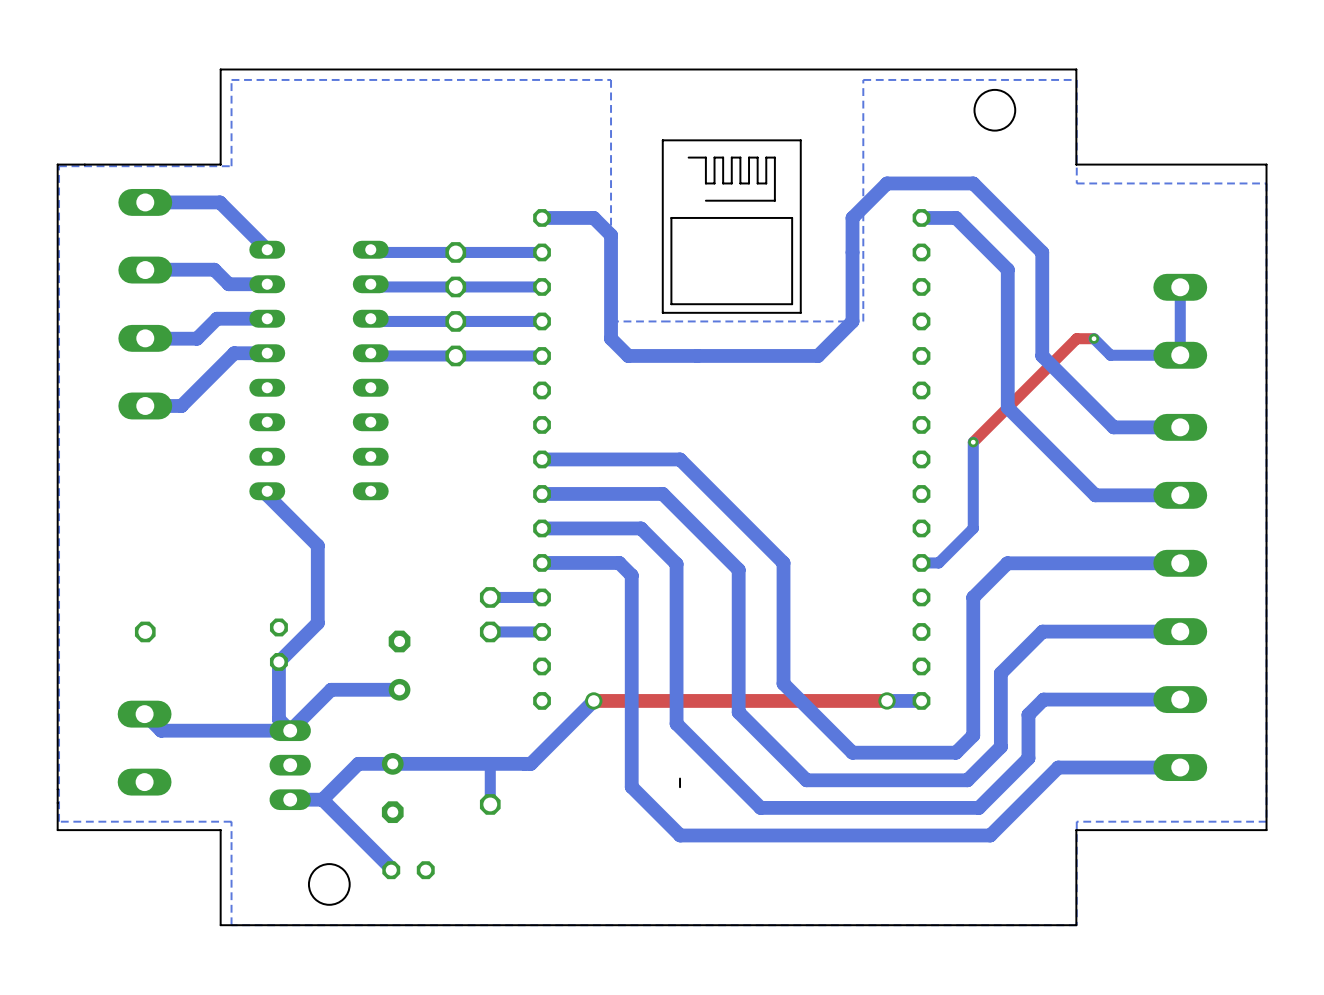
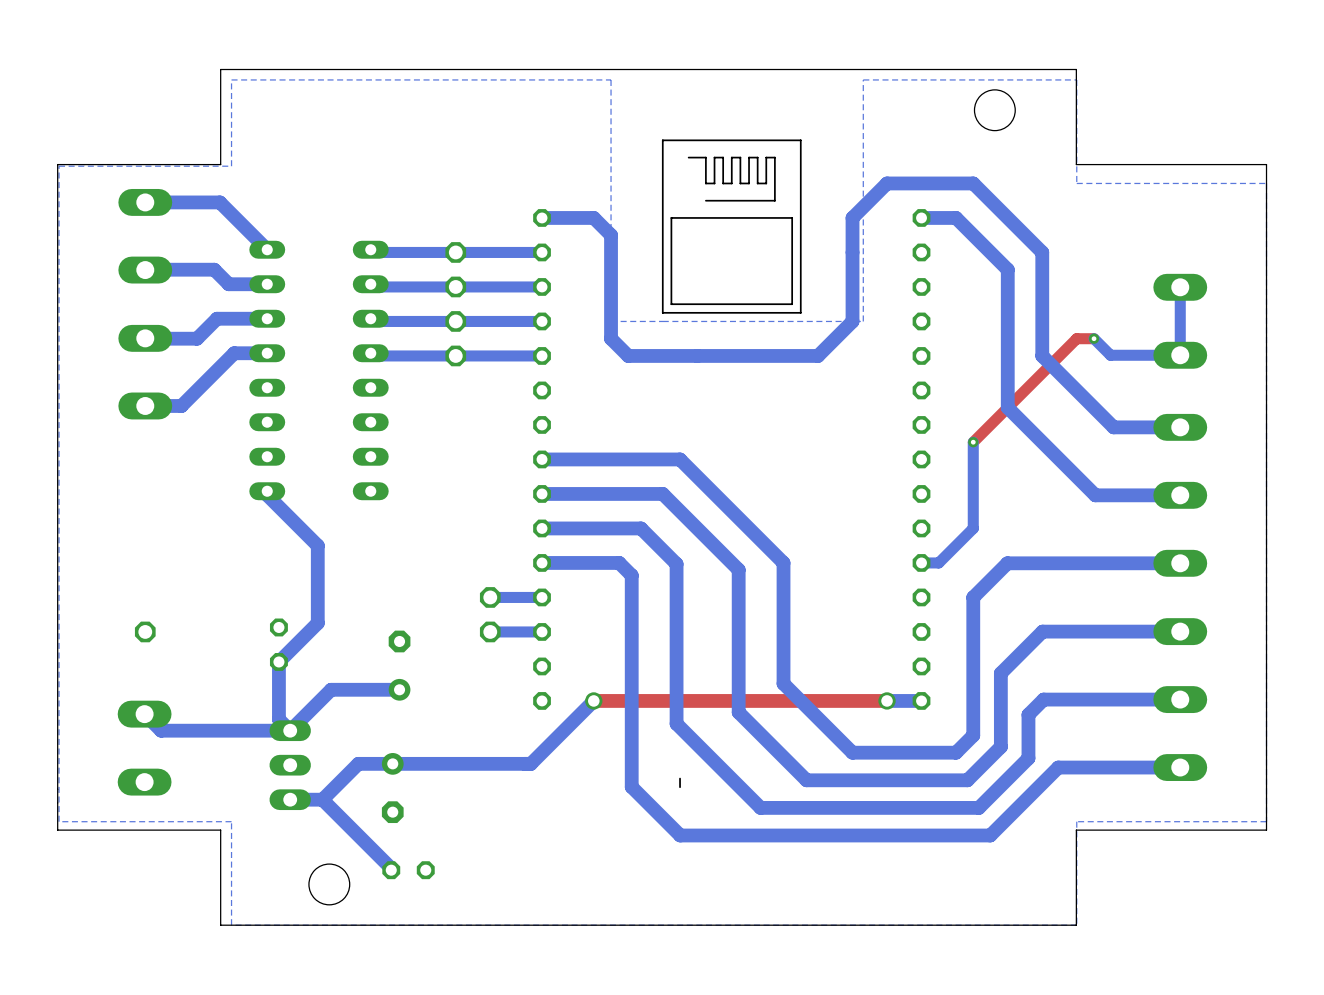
bottom track: (490, 763) (490, 804) -> none
part: (490, 804) -> none

